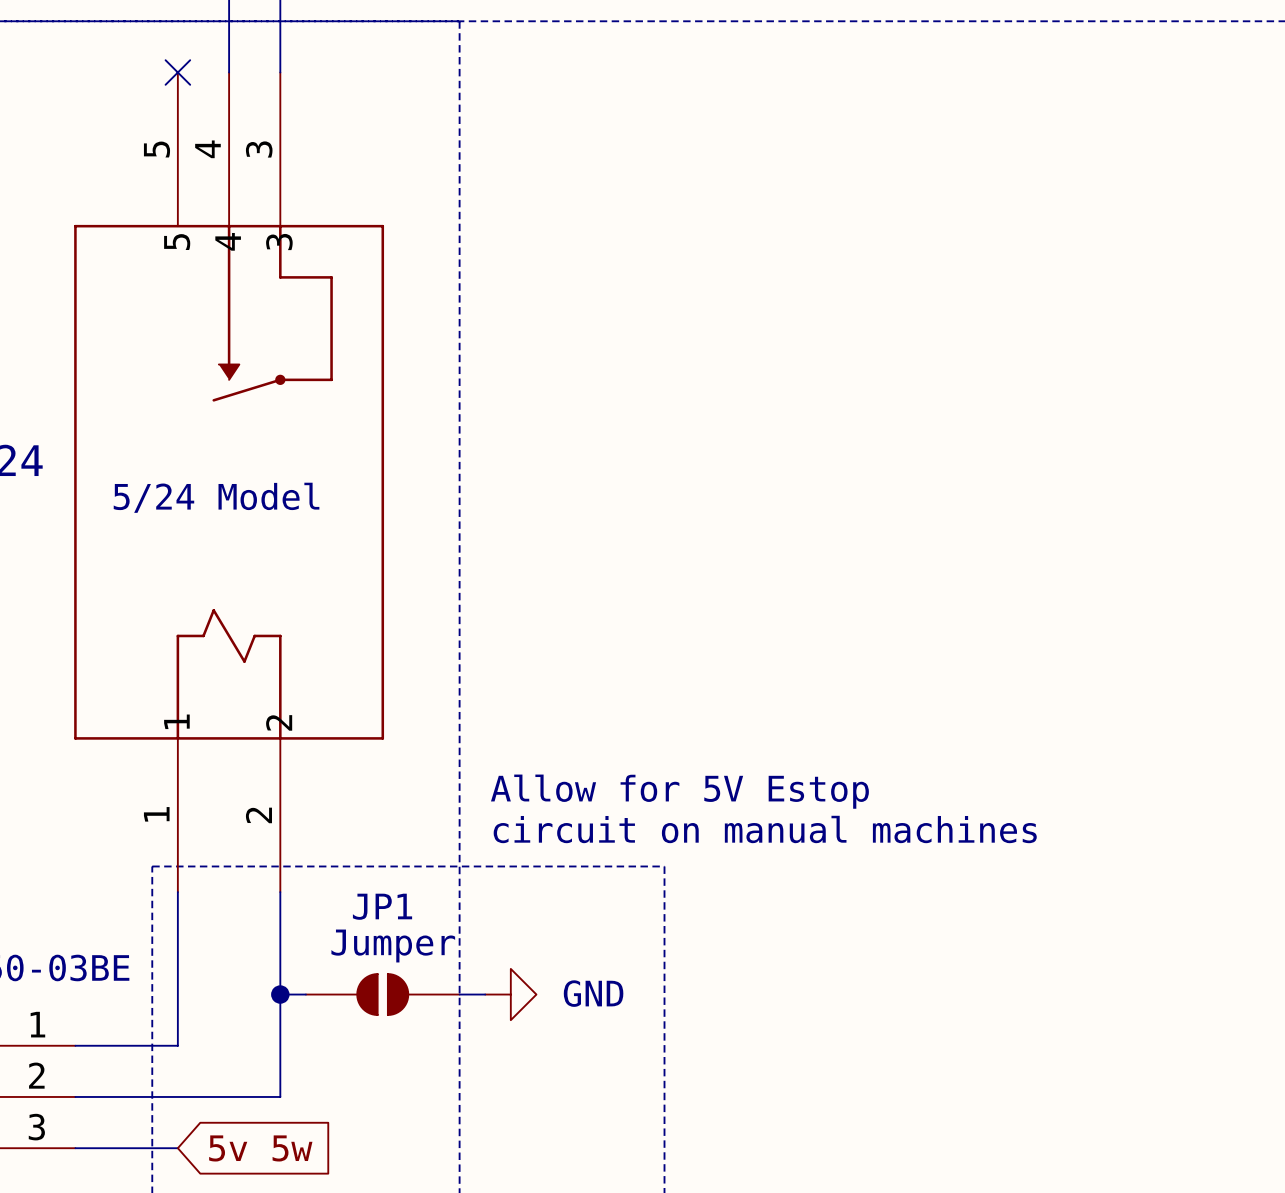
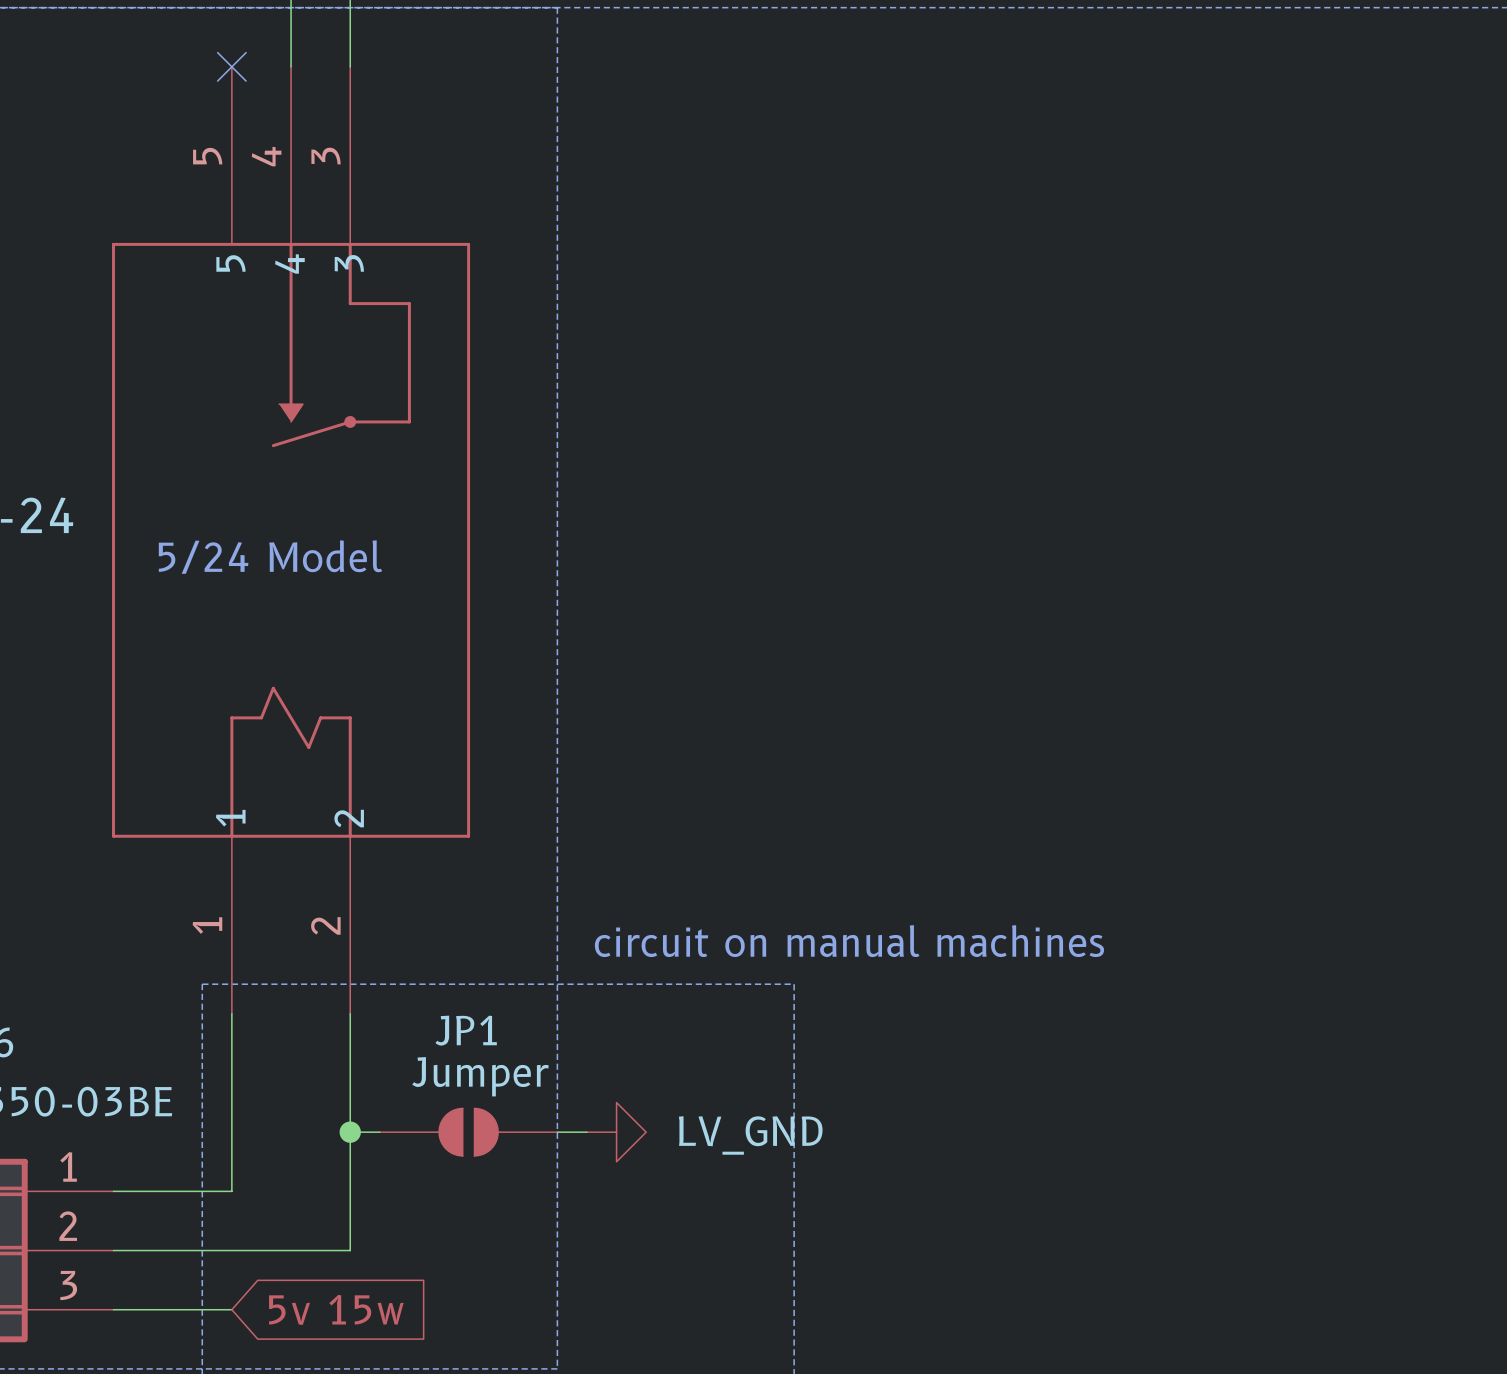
text: Allow for 5V Estop (679, 791) -> none
power symbol: GND (510, 994) -> LV_GND (616, 1132)
global label: 5v 5w (260, 1148) -> 5v 15w (336, 1309)

